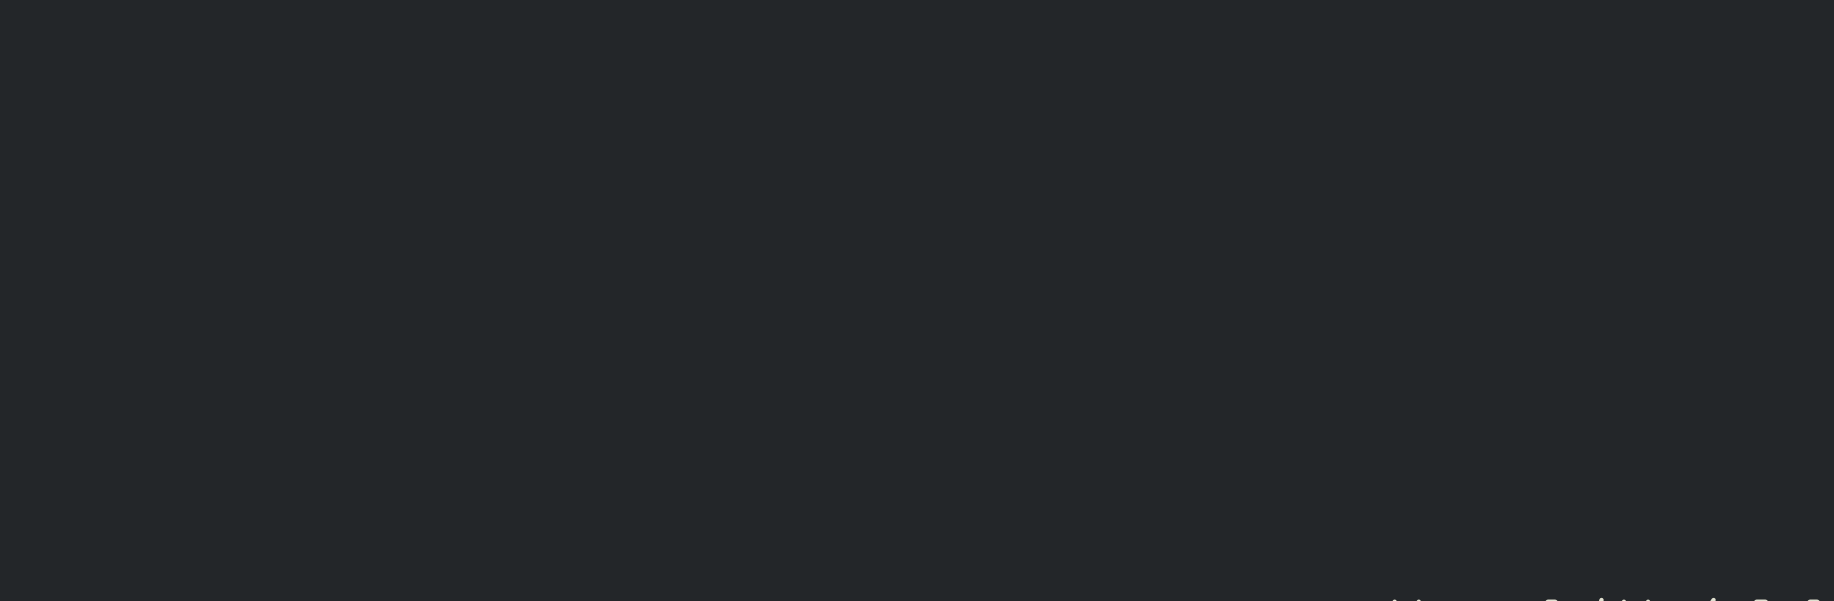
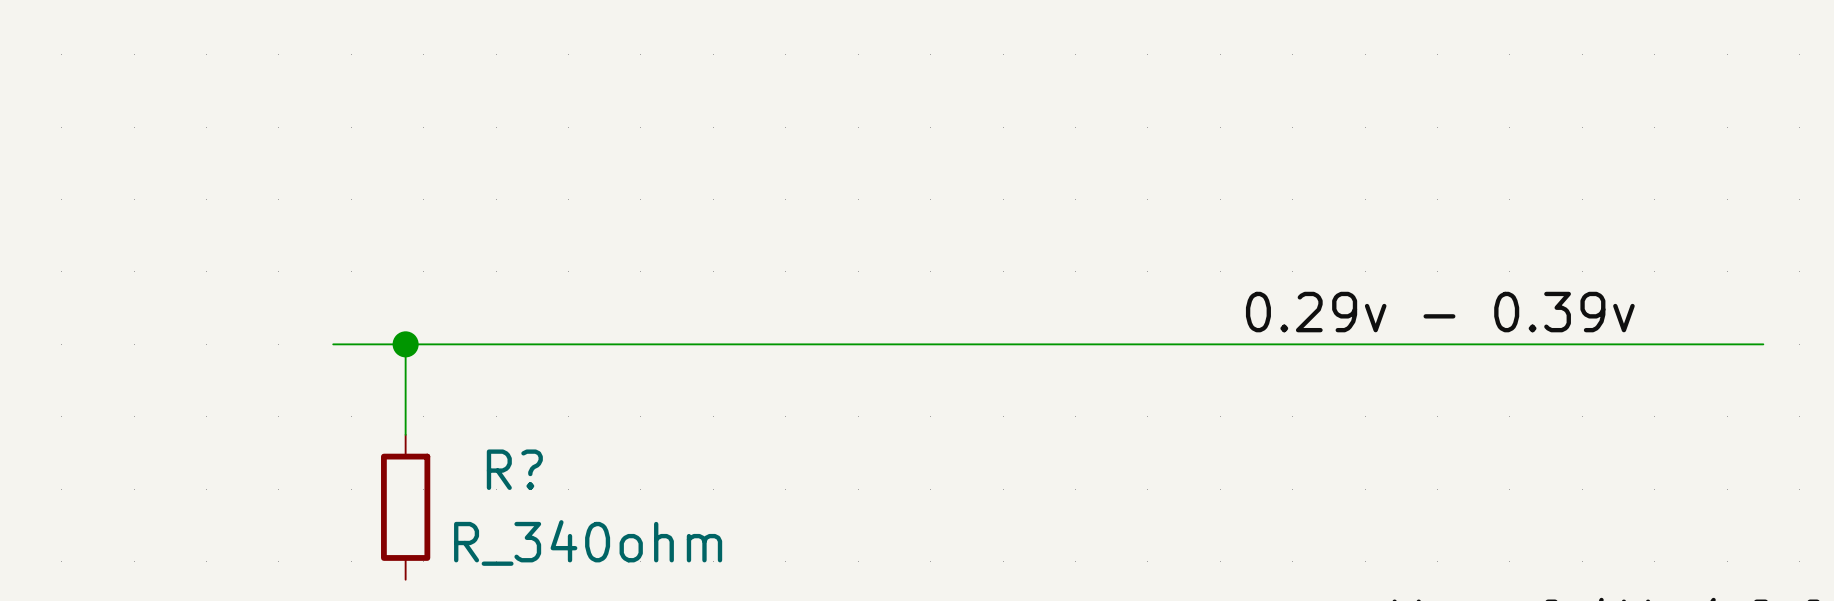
label: none -> 0.29v - 0.39v (1440, 312)
wire: none -> (333, 344) (1763, 344)
wire: none -> (405, 344) (405, 434)
junction: none -> (405, 344)
R?: none -> R_340ohm (405, 507)

